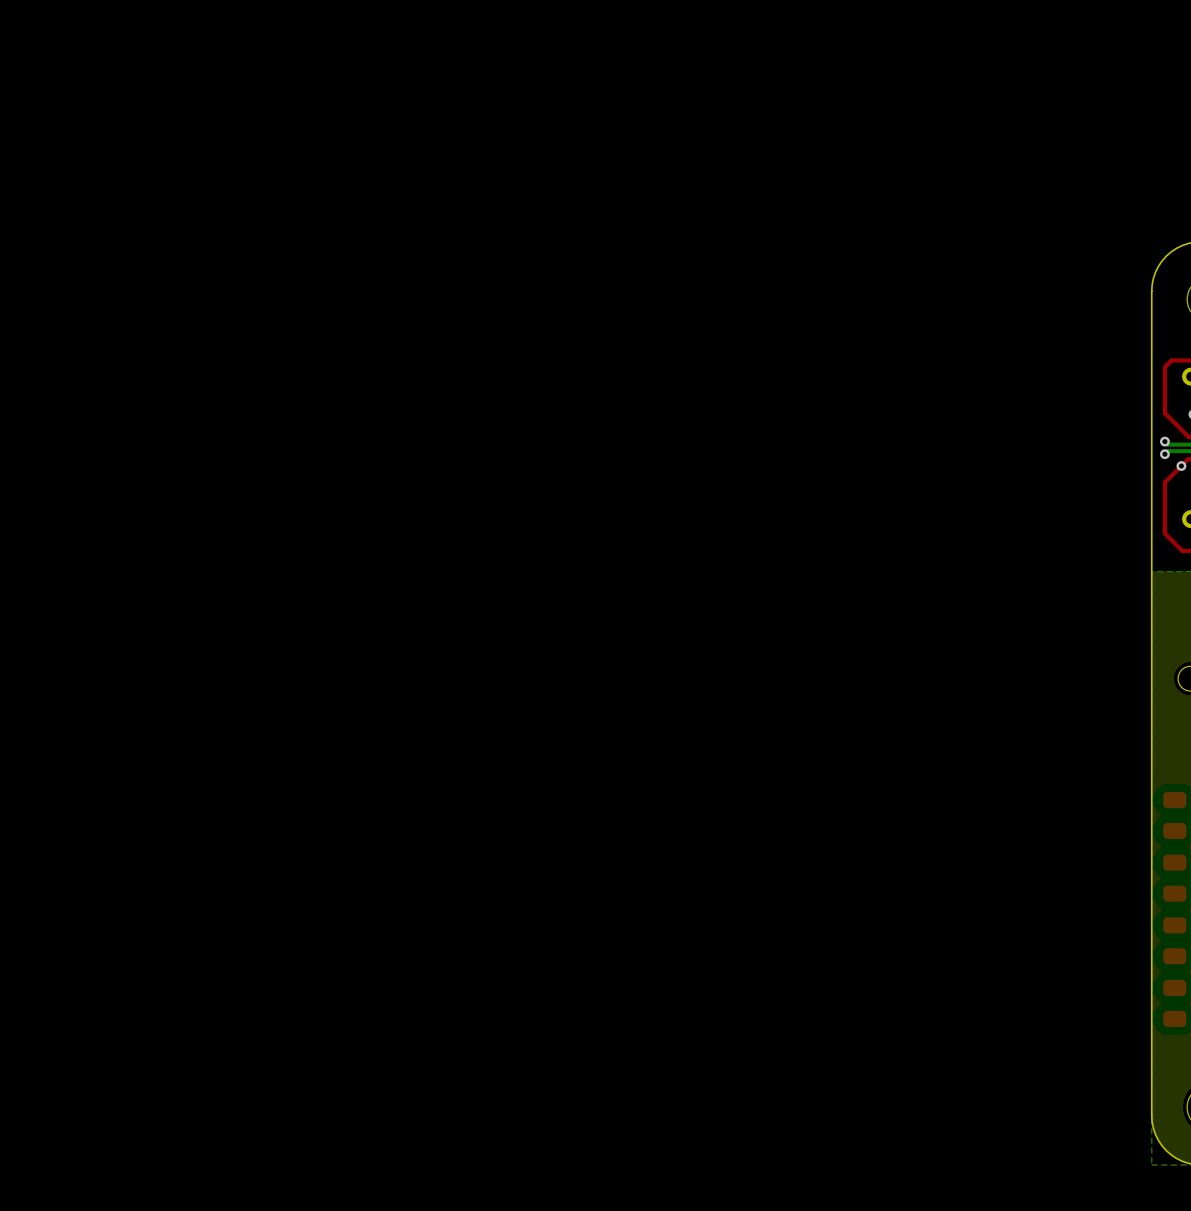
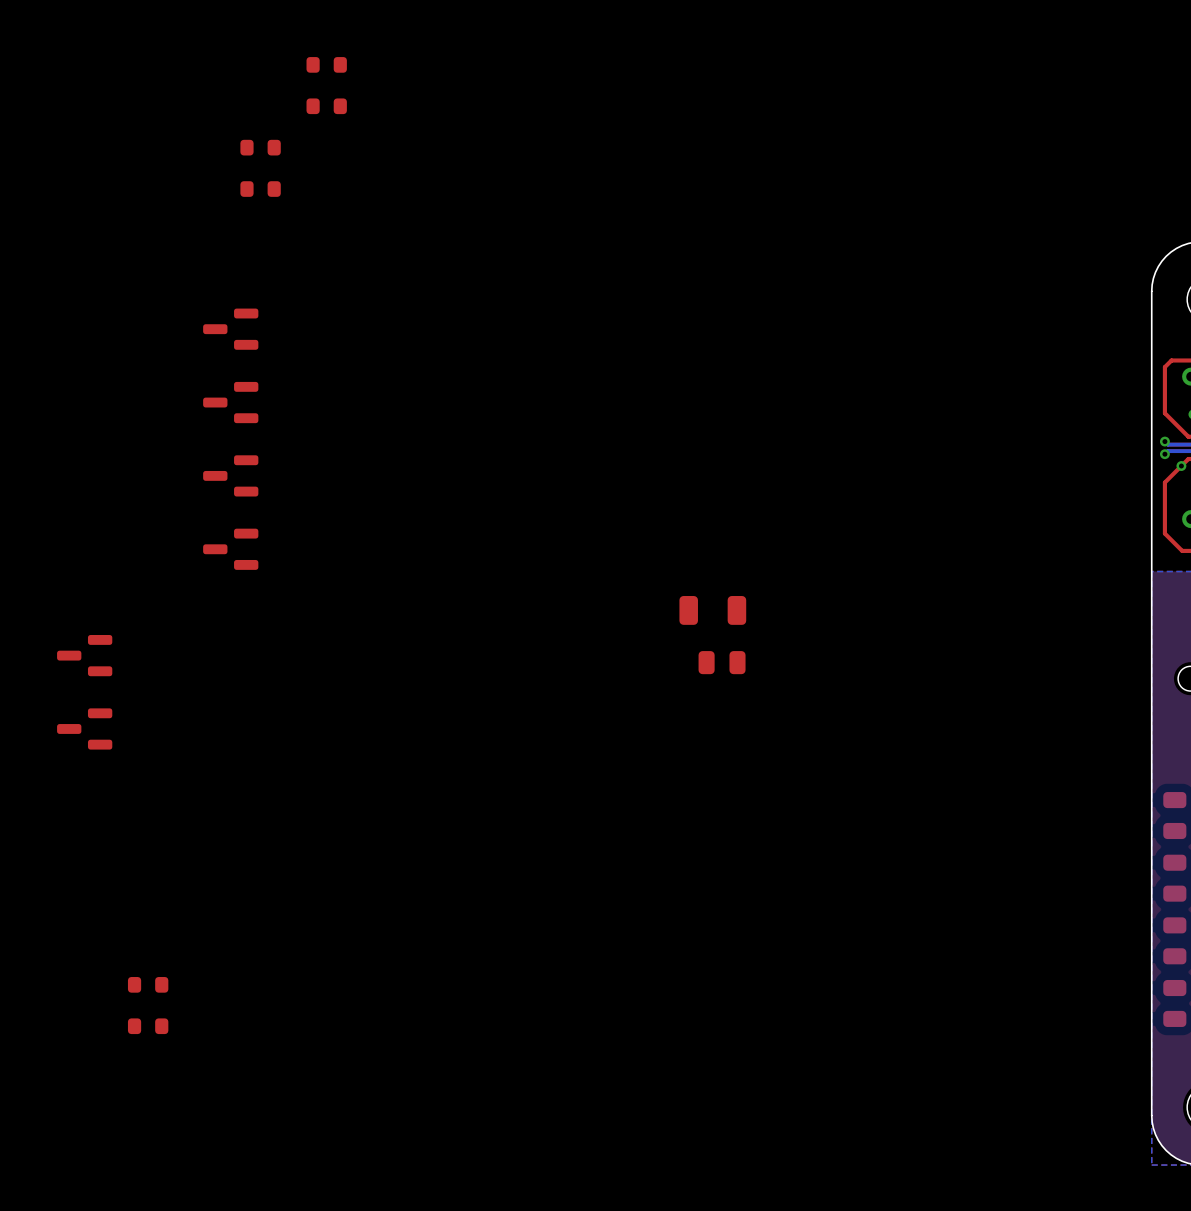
part: none -> (326, 64)
part: none -> (326, 106)
part: none -> (260, 147)
part: none -> (260, 189)
part: none -> (230, 329)
part: none -> (230, 402)
part: none -> (230, 475)
part: none -> (230, 549)
part: none -> (712, 610)
part: none -> (84, 655)
part: none -> (722, 662)
part: none -> (84, 728)
part: none -> (148, 984)
part: none -> (148, 1026)

